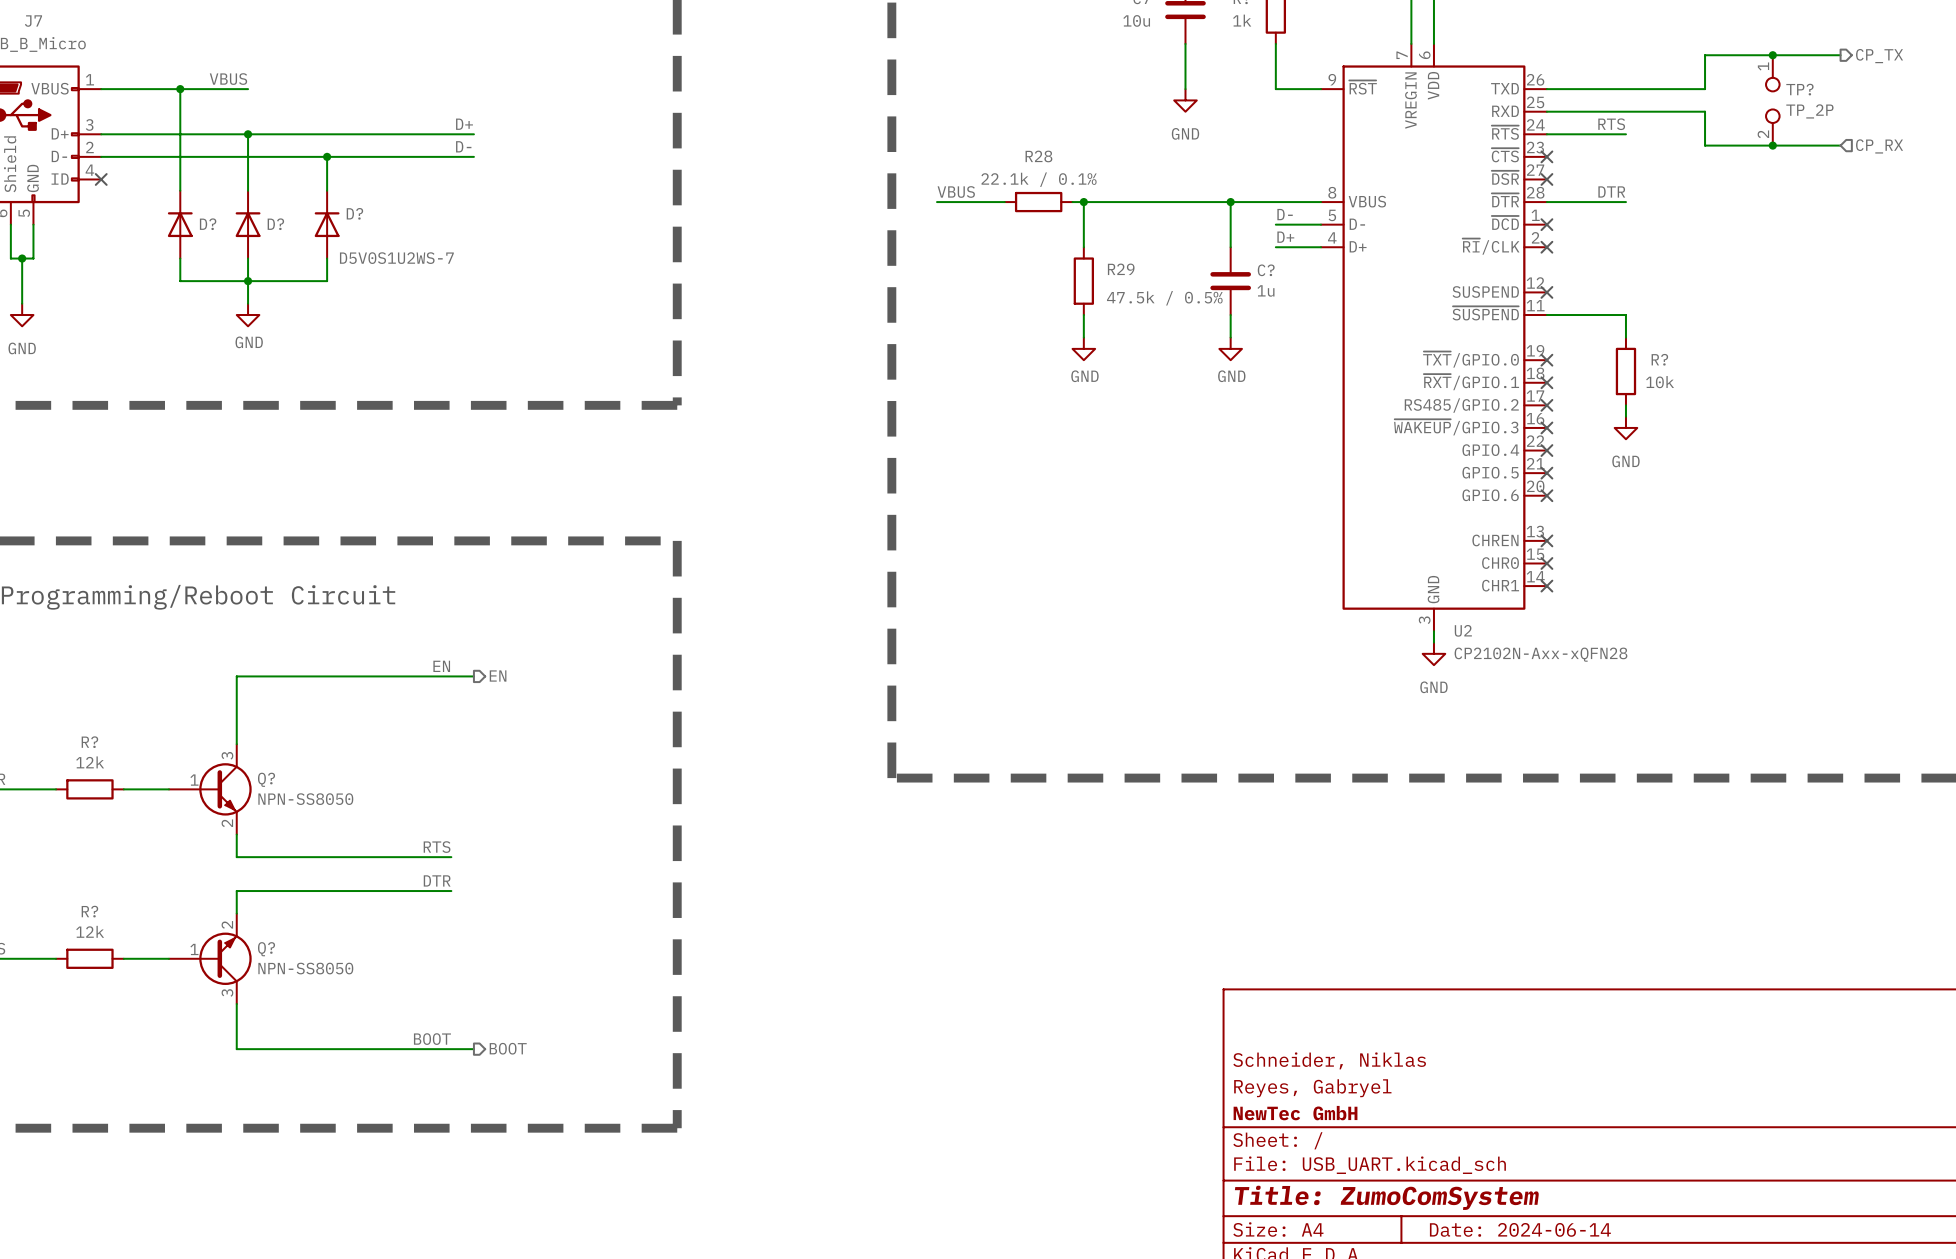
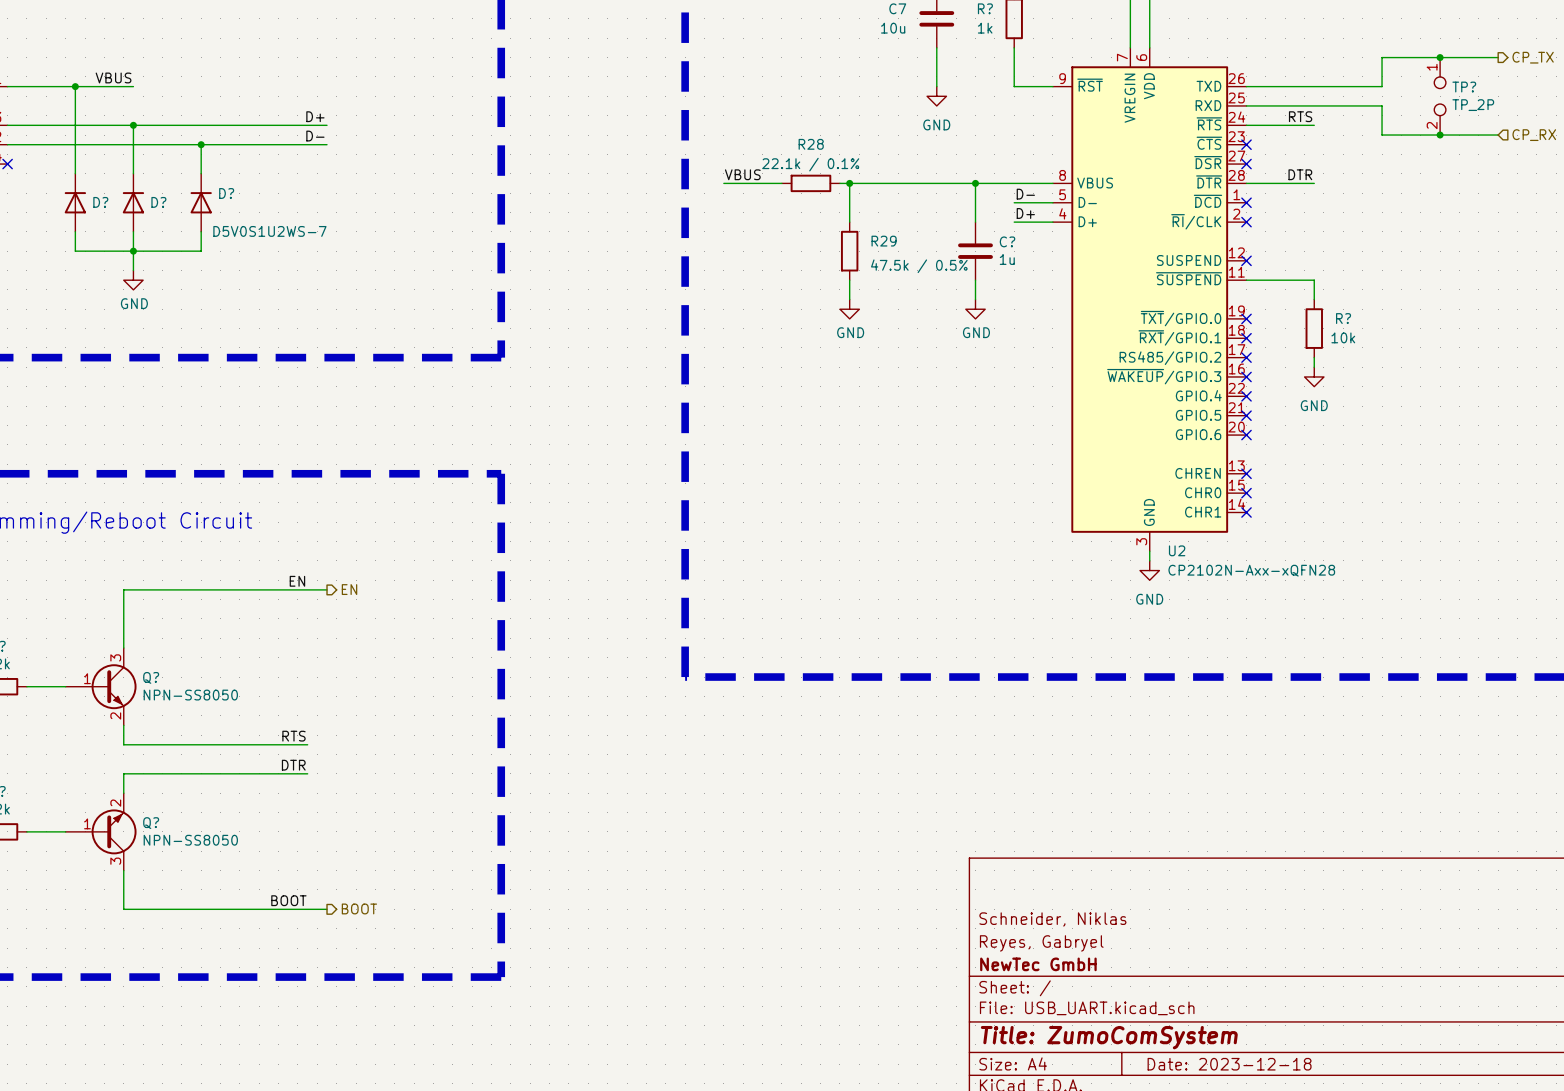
title block: Date: 2024-06-14 (1520, 1229) -> Date: 2023-12-18 (1229, 1064)

